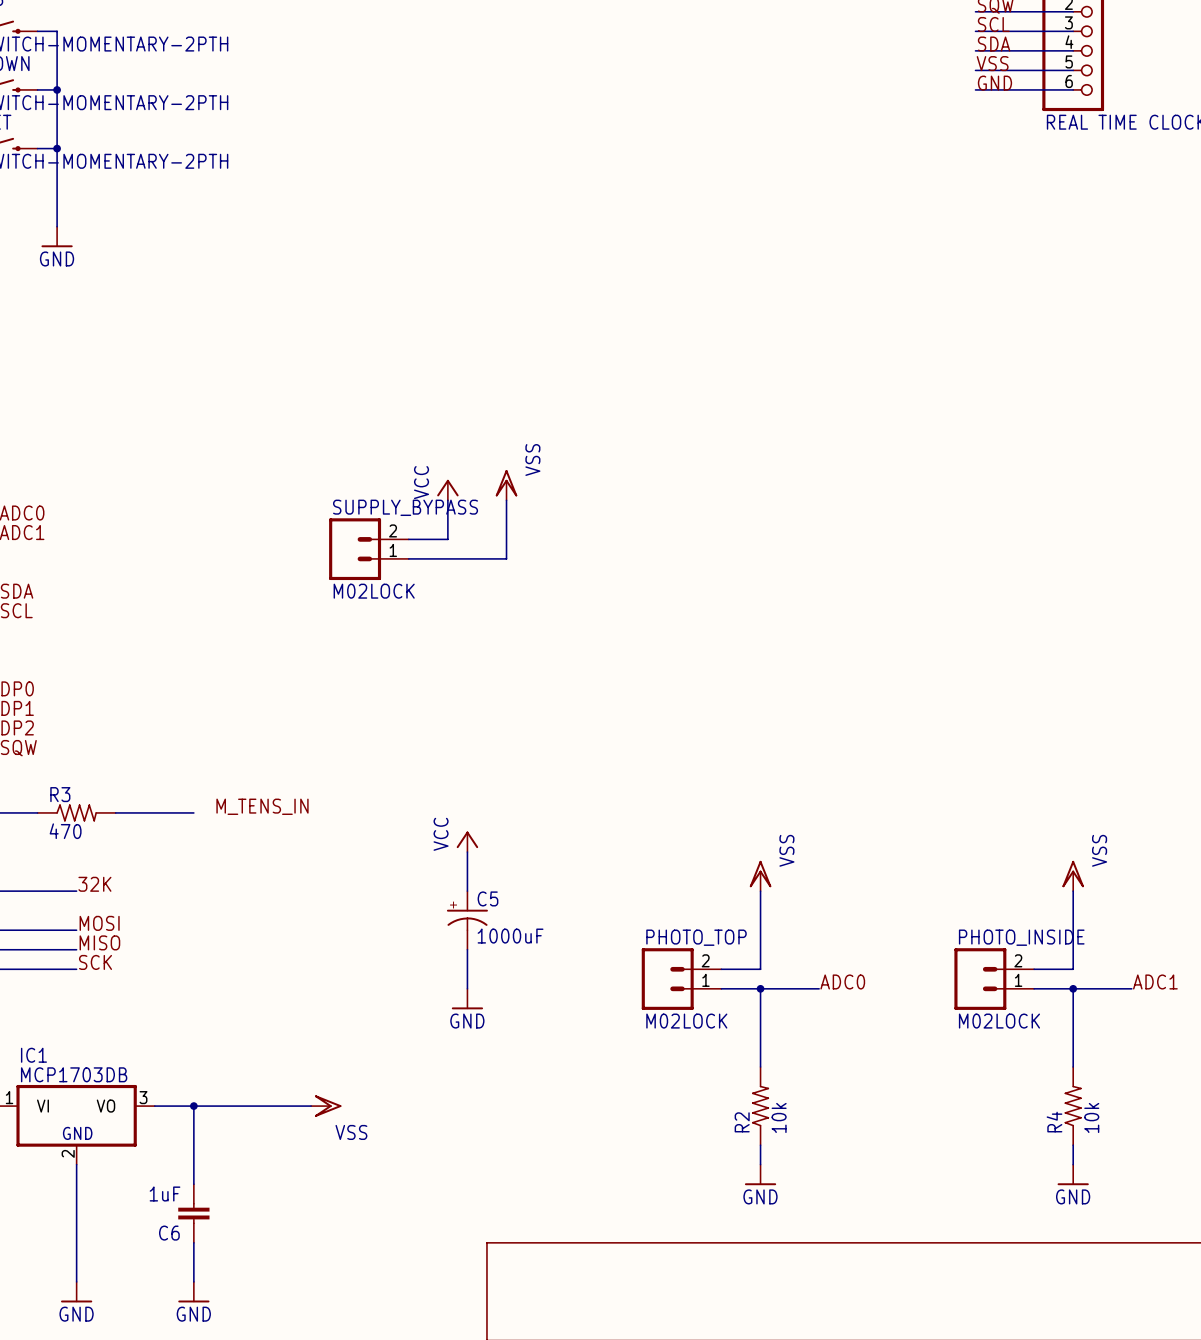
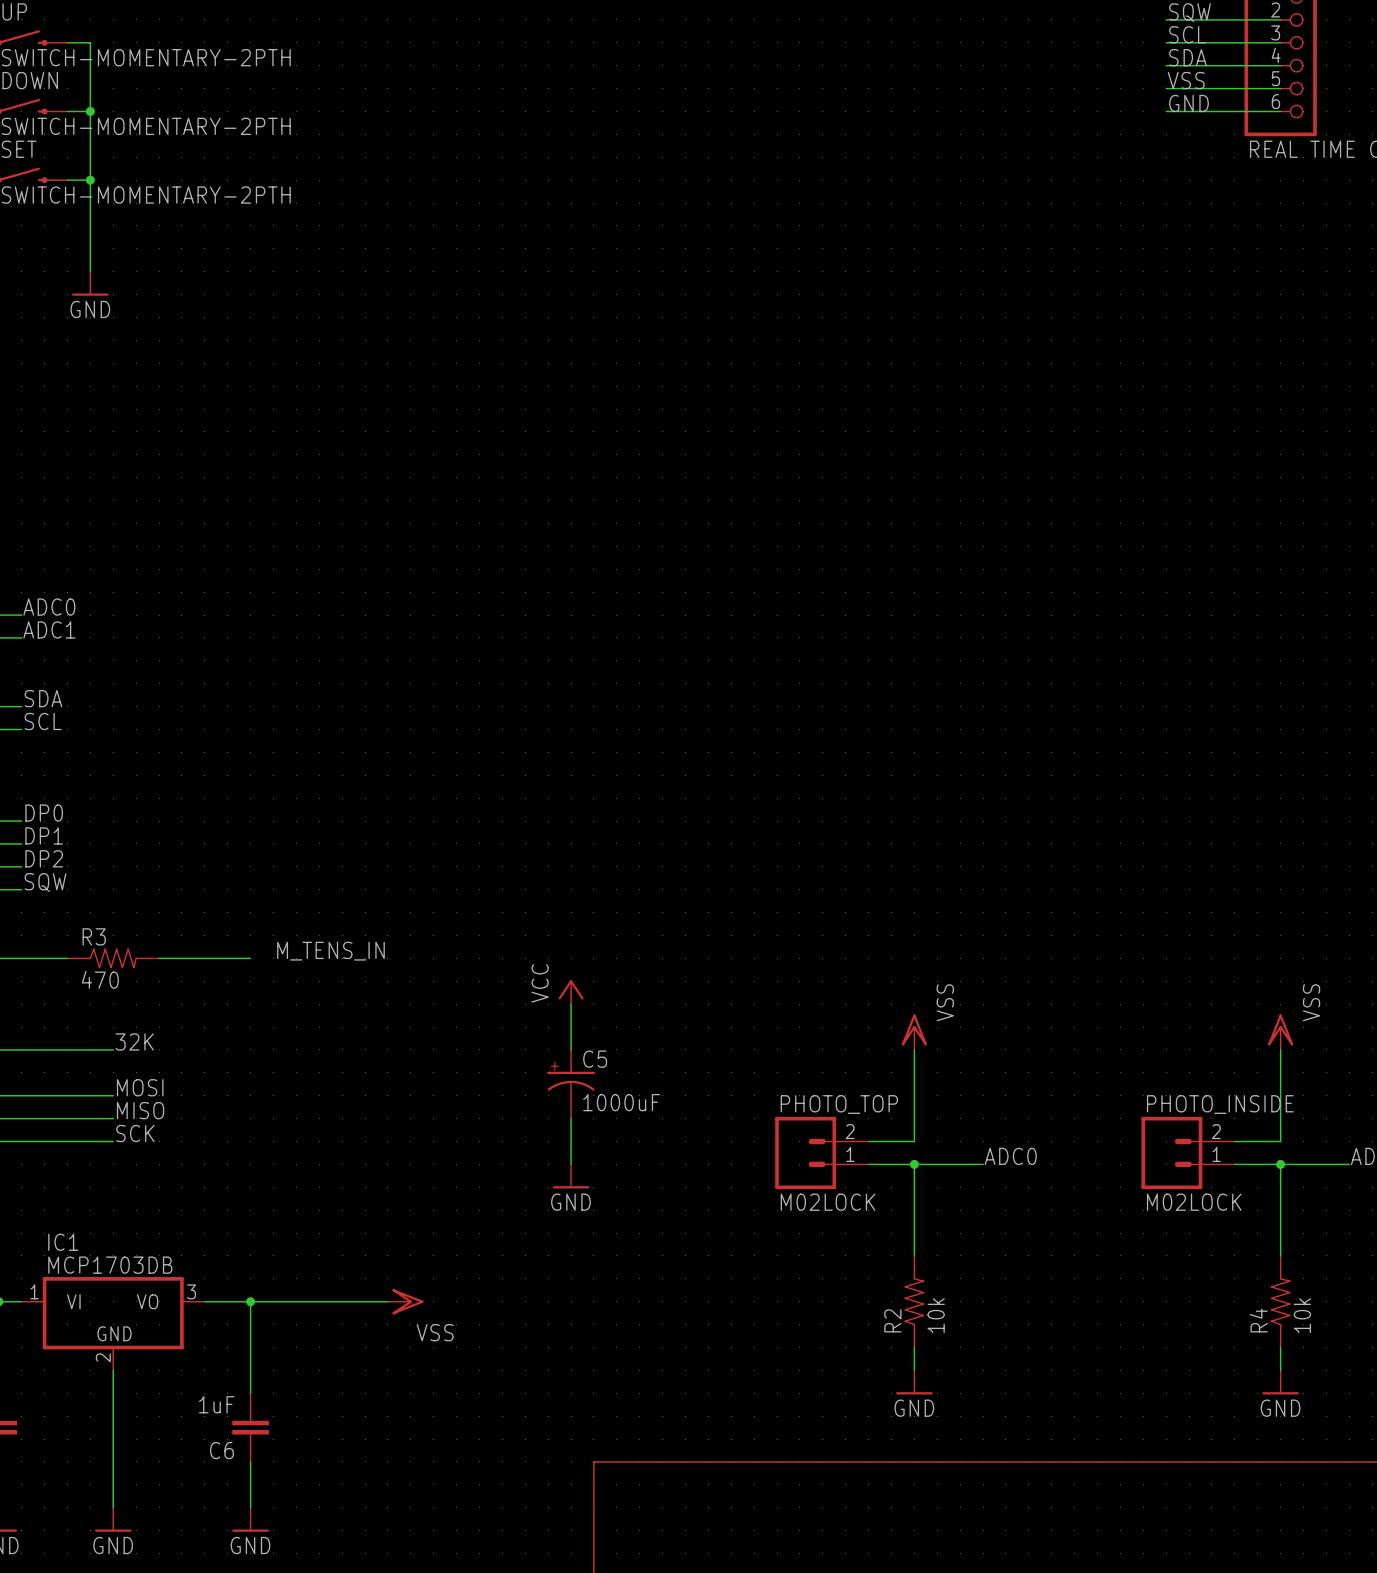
power symbol: VSS (506, 485) -> none
power symbol: VCC (447, 490) -> none
wire: (447, 500) (447, 539) (408, 539) -> none
wire: (506, 500) (506, 558) (408, 558) -> none
SUPPLY_BYPASS: M02LOCK (368, 549) -> none

